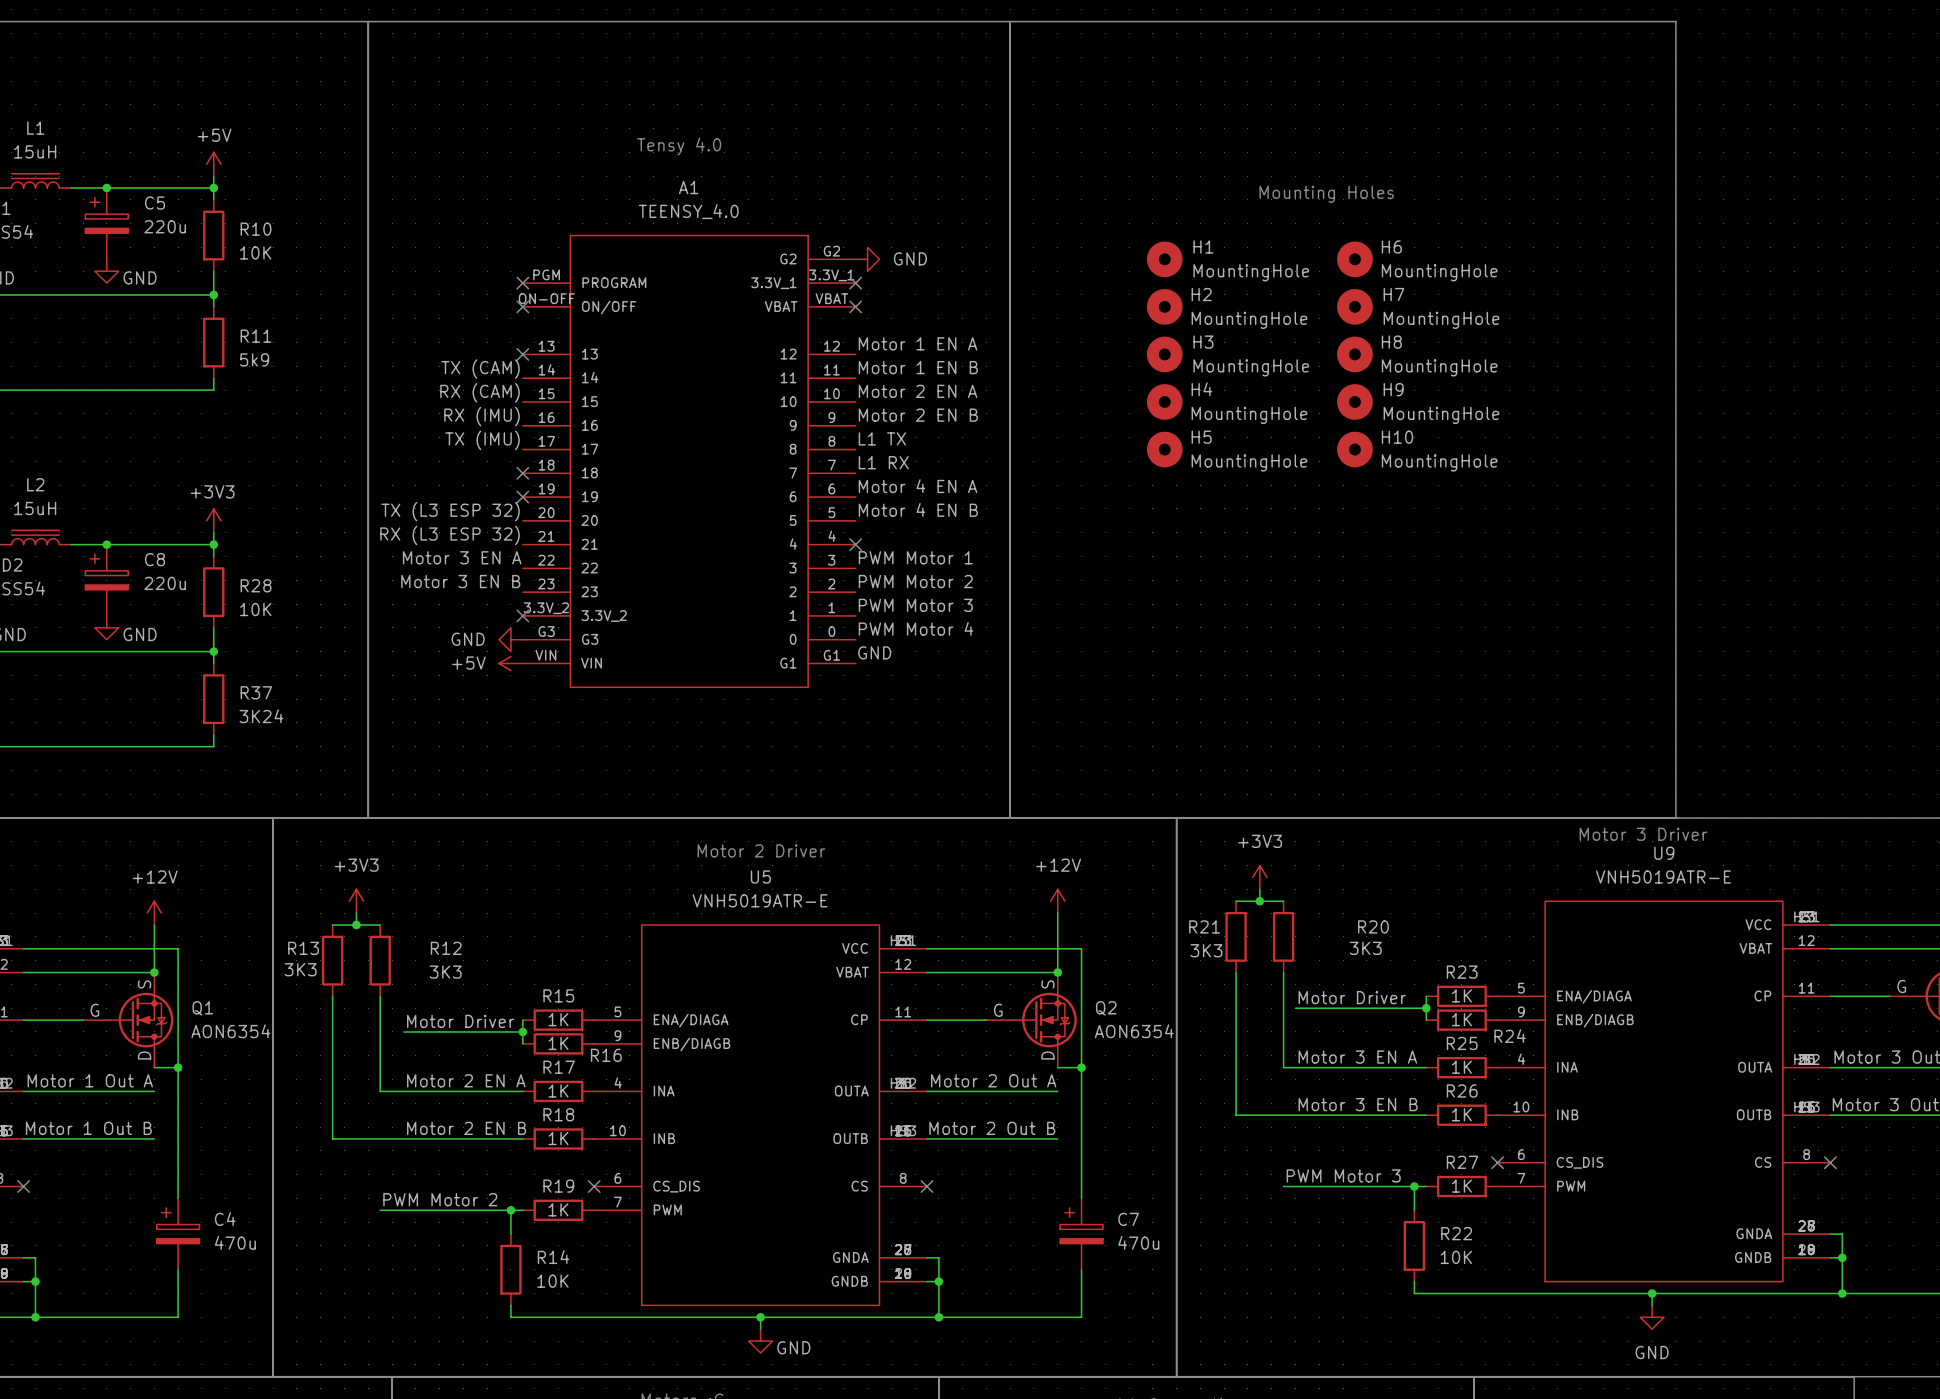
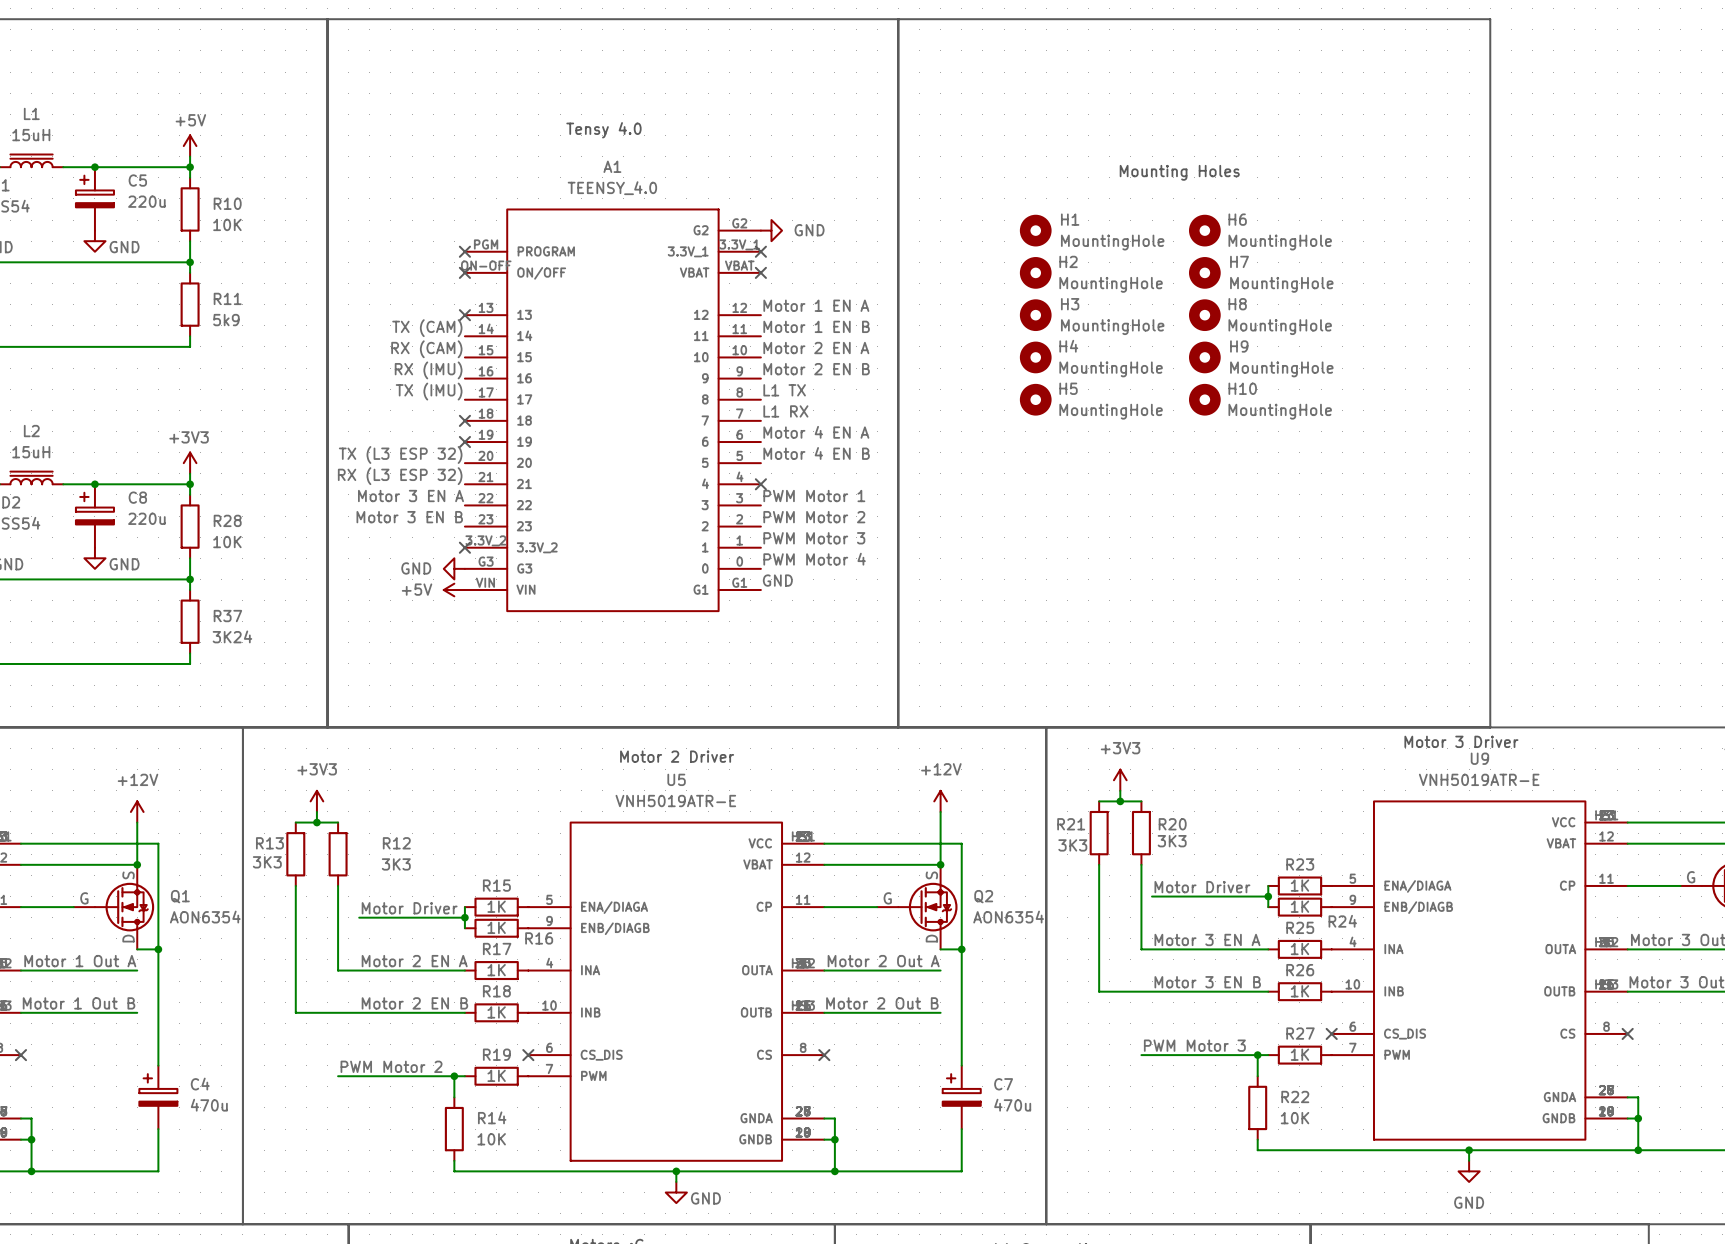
R20 name position: R20 (1373, 926) -> R20 (1172, 824)
R20 value position: 3K3 (1365, 948) -> 3K3 (1172, 841)

